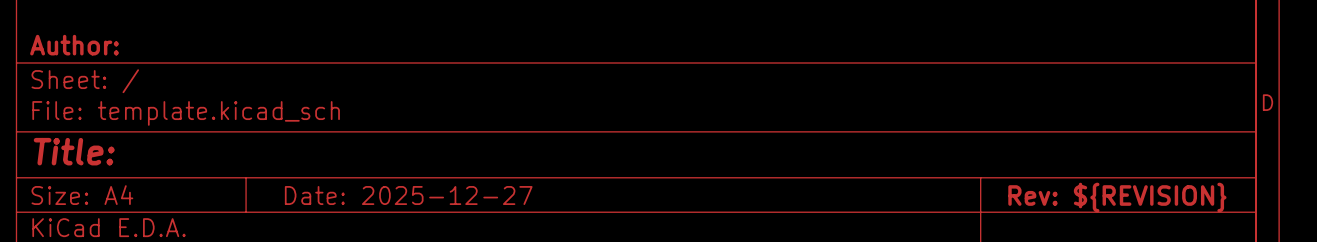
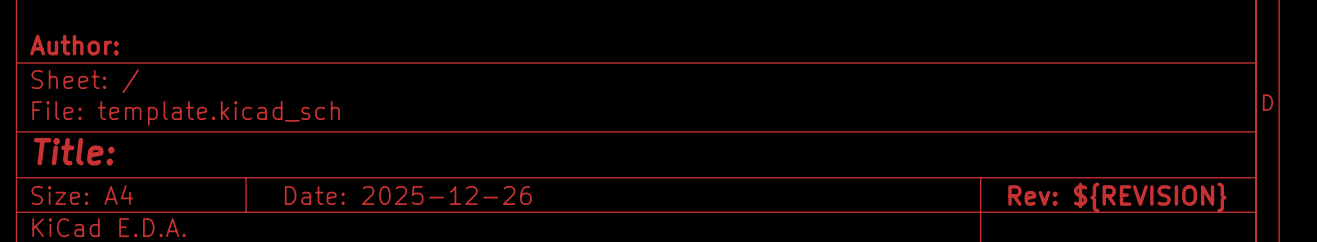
title block: Date: 2025-12-27 (408, 195) -> Date: 2025-12-26 (408, 195)

